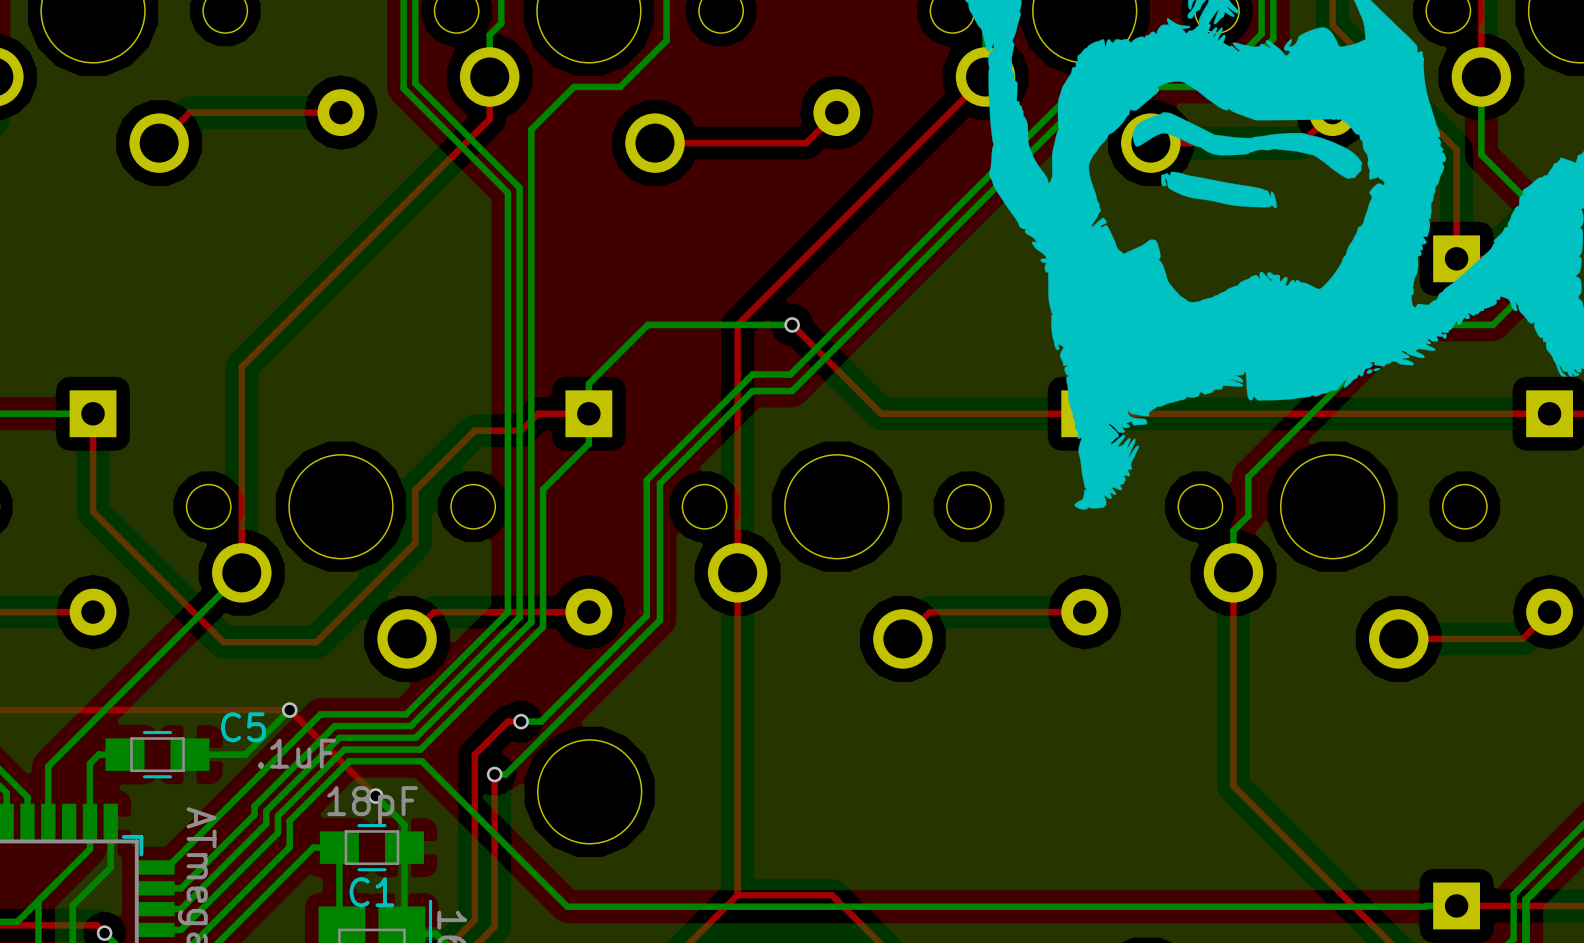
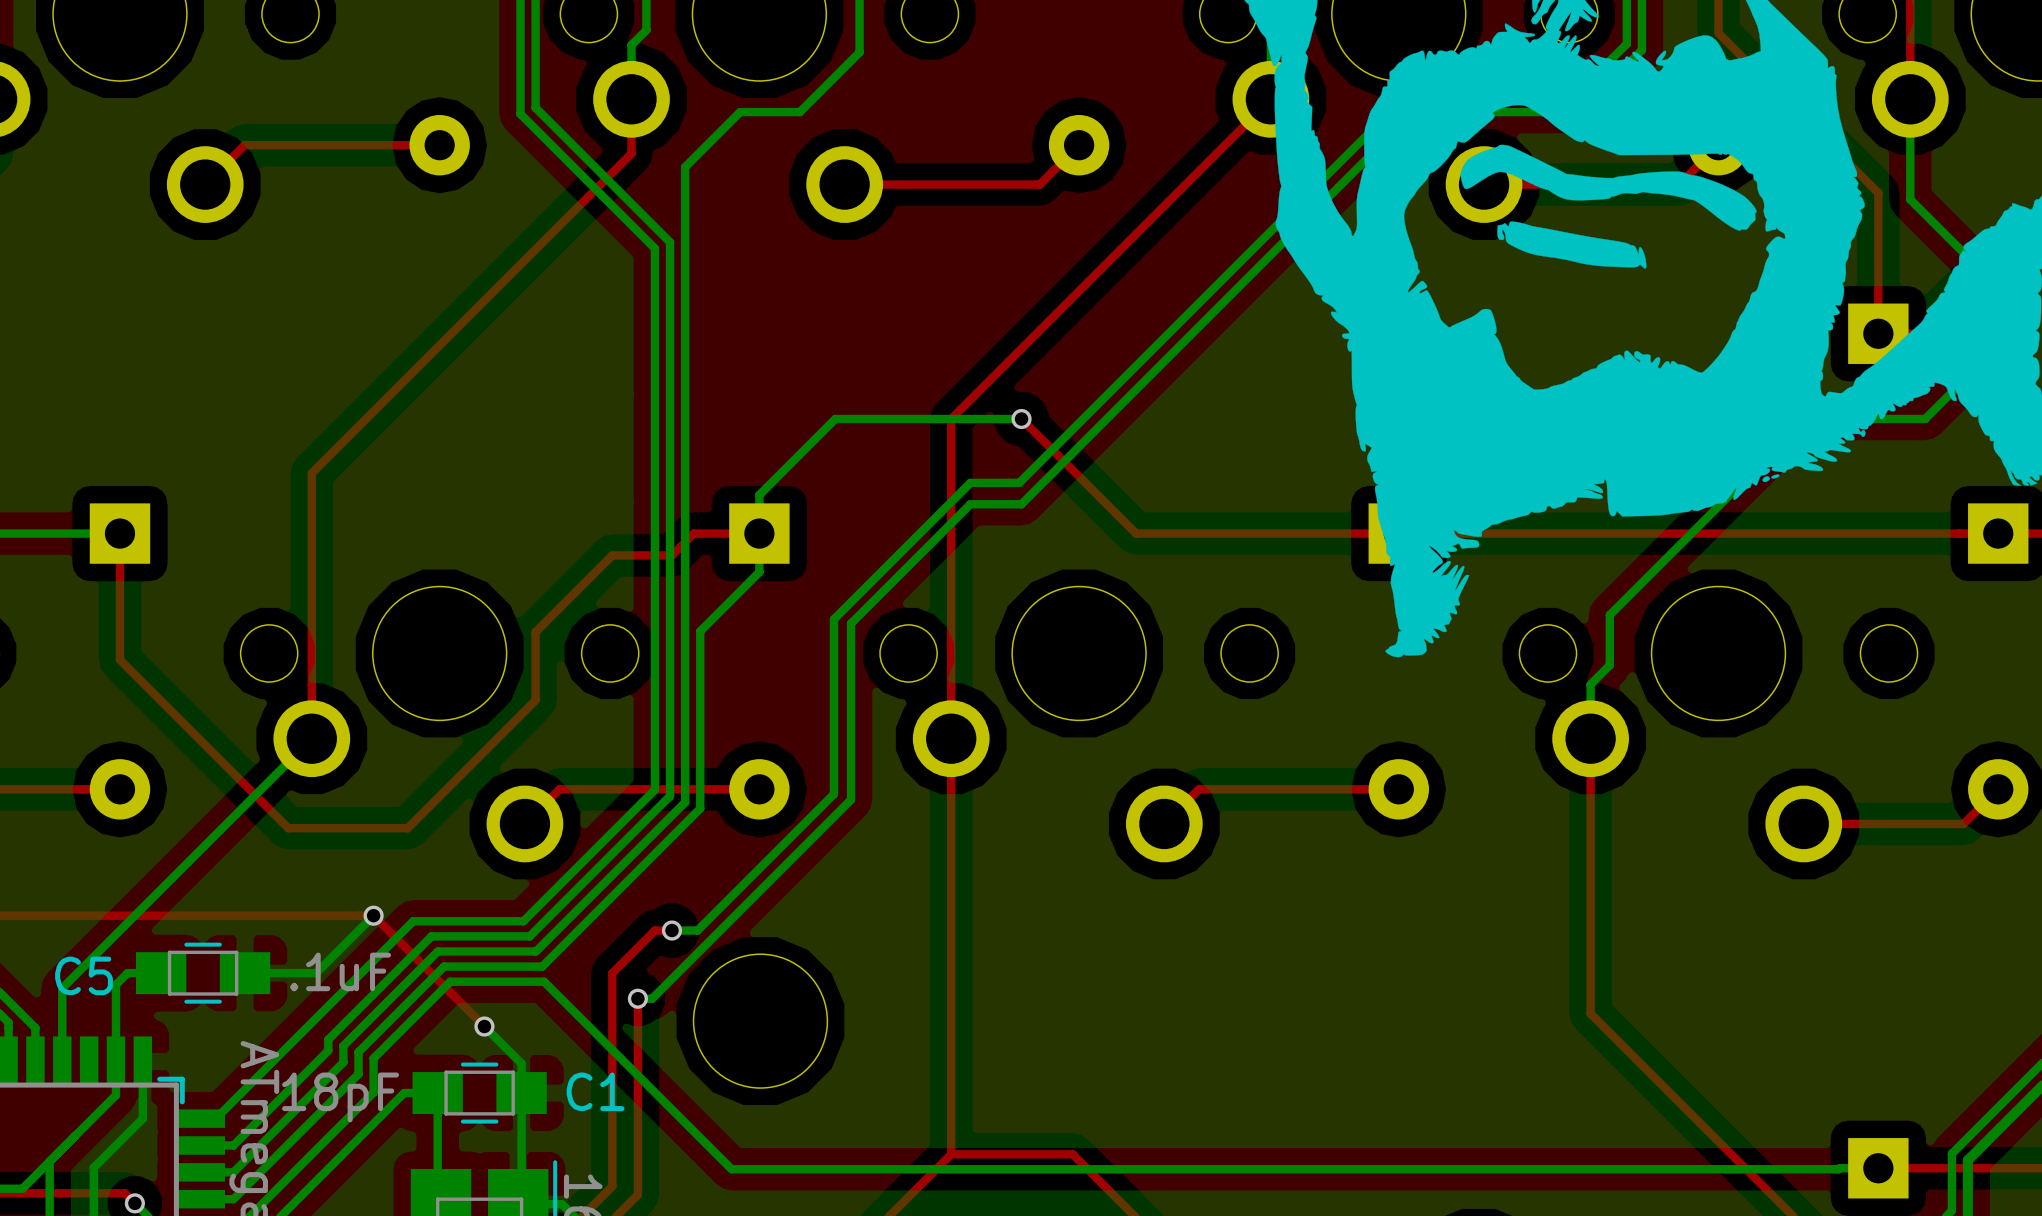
C5 name position: C5 (243, 727) -> C5 (84, 975)
C5 value position: .1uF (296, 753) -> .1uF (340, 971)
C1 value position: 18pF (372, 805) -> 18pF (340, 1097)
C1 name position: C1 (371, 892) -> C1 (595, 1091)

